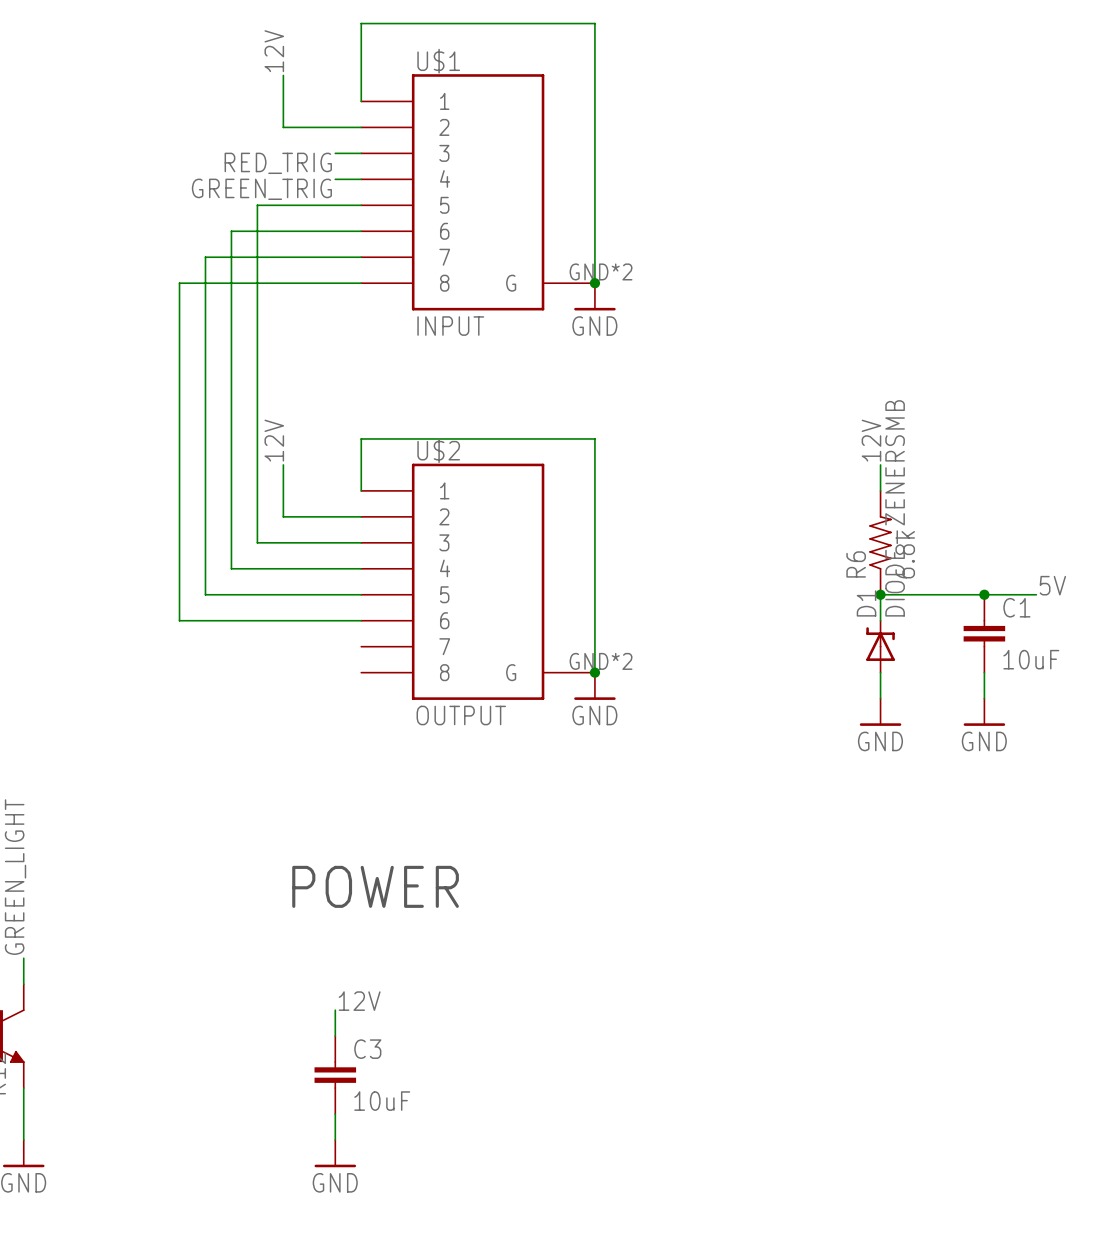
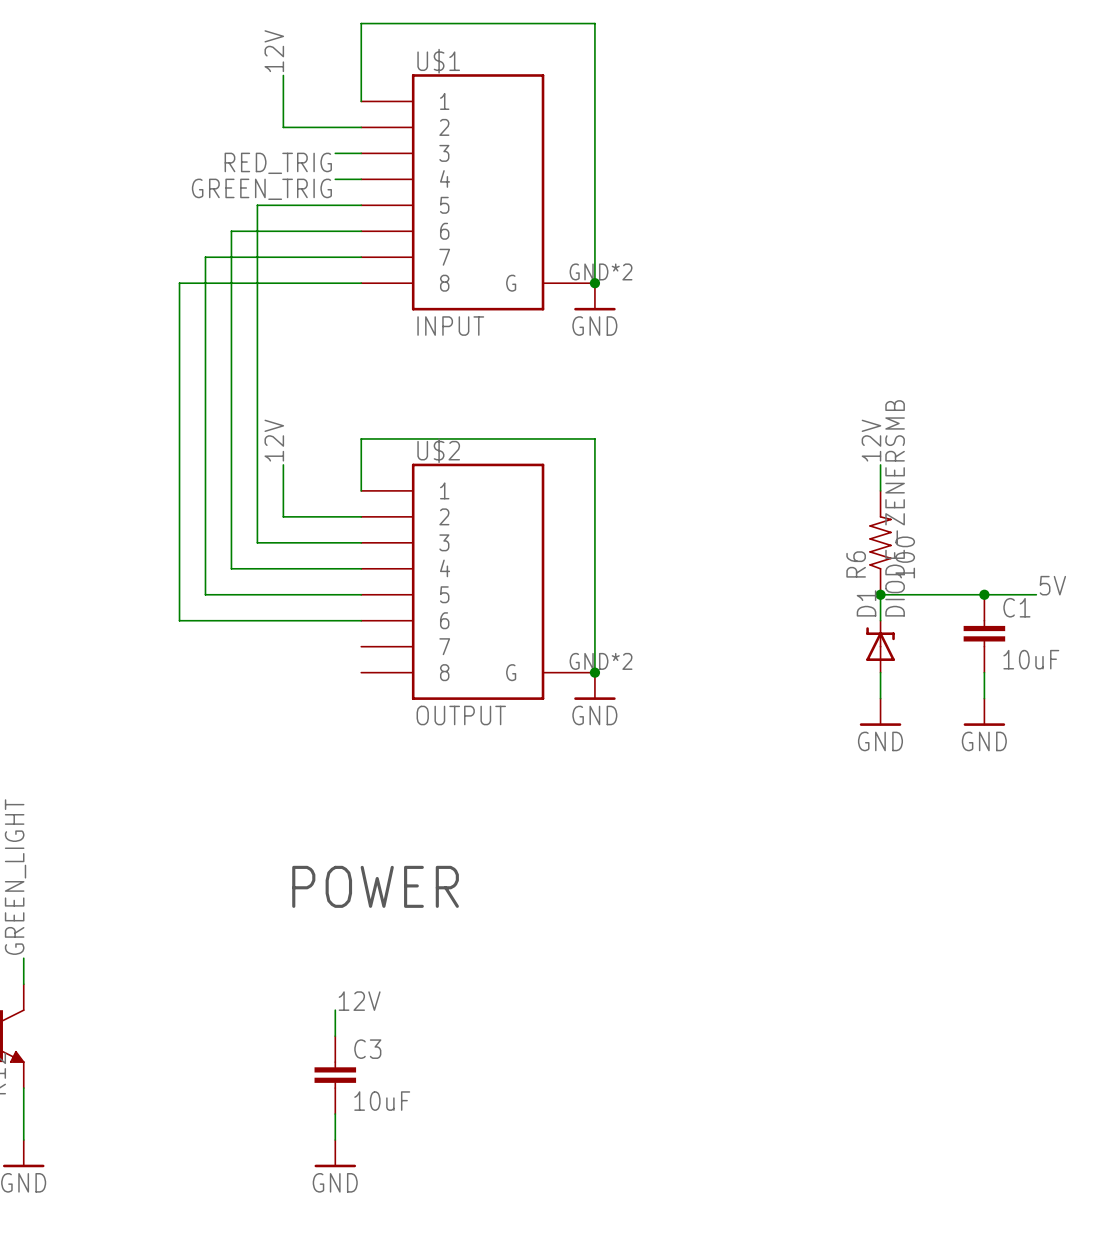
R6 value: 6.8k (905, 554) -> 100 (905, 557)

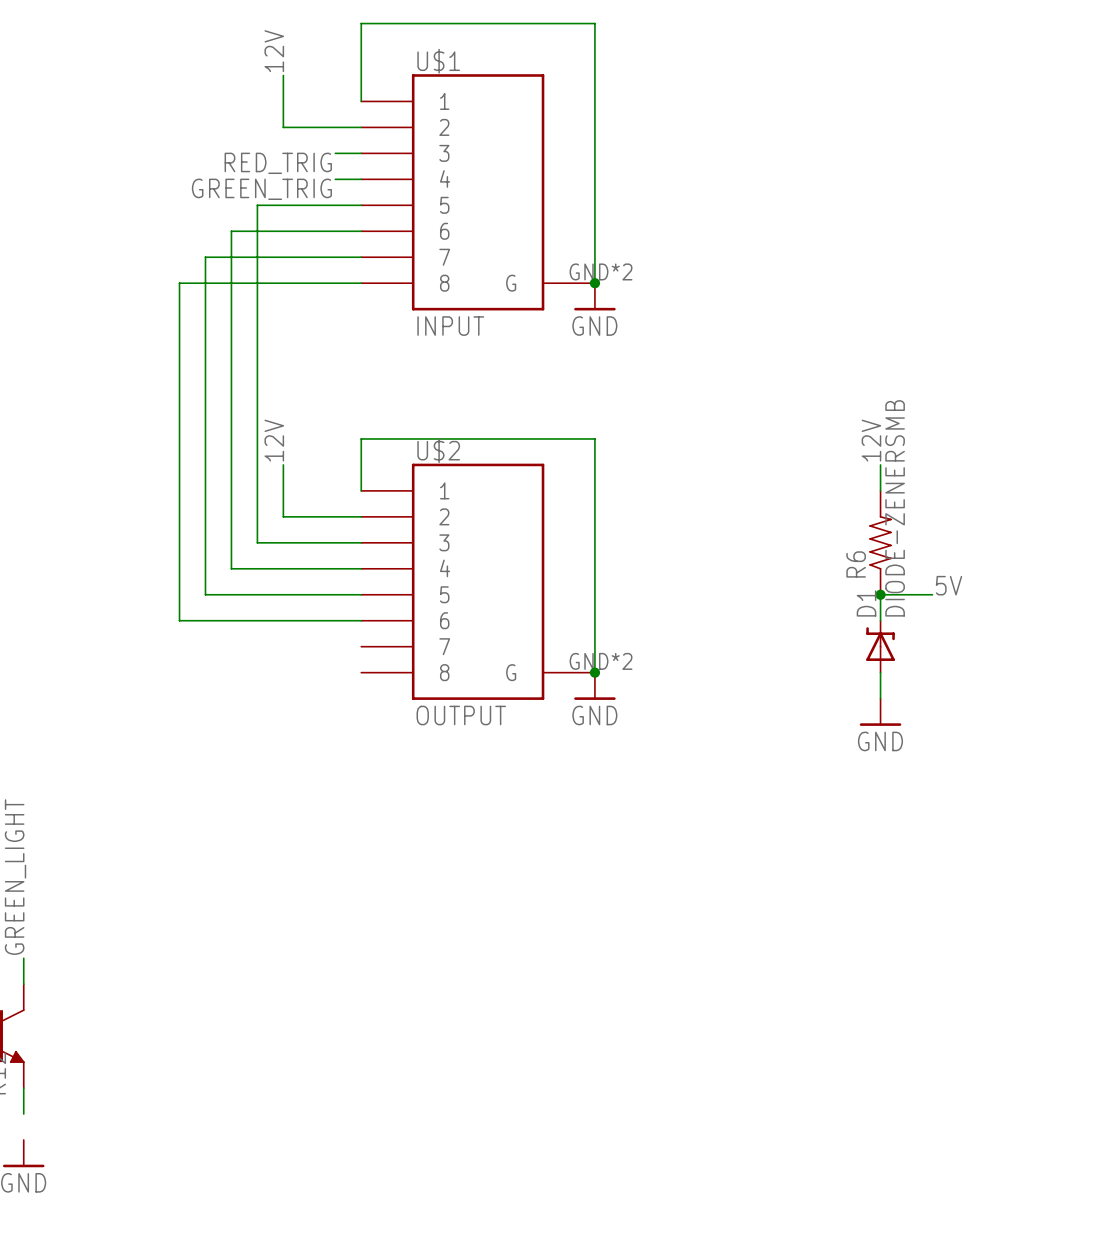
R6 value: 100 (905, 557) -> none
label position: 5V (1052, 585) -> 5V (949, 585)
wire: (932, 594) (1036, 594) -> none
junction: (984, 594) -> none
C1: 10uF (984, 633) -> none
wire: (984, 672) (984, 698) -> none
power symbol: GND (984, 712) -> none
text: POWER (375, 886) -> none
label: 12V (359, 1001) -> none
wire: (335, 1010) (335, 1036) -> none
C3: 10uF (335, 1075) -> none
wire: (23, 1114) (23, 1140) -> none
wire: (335, 1114) (335, 1140) -> none
power symbol: GND (335, 1153) -> none

